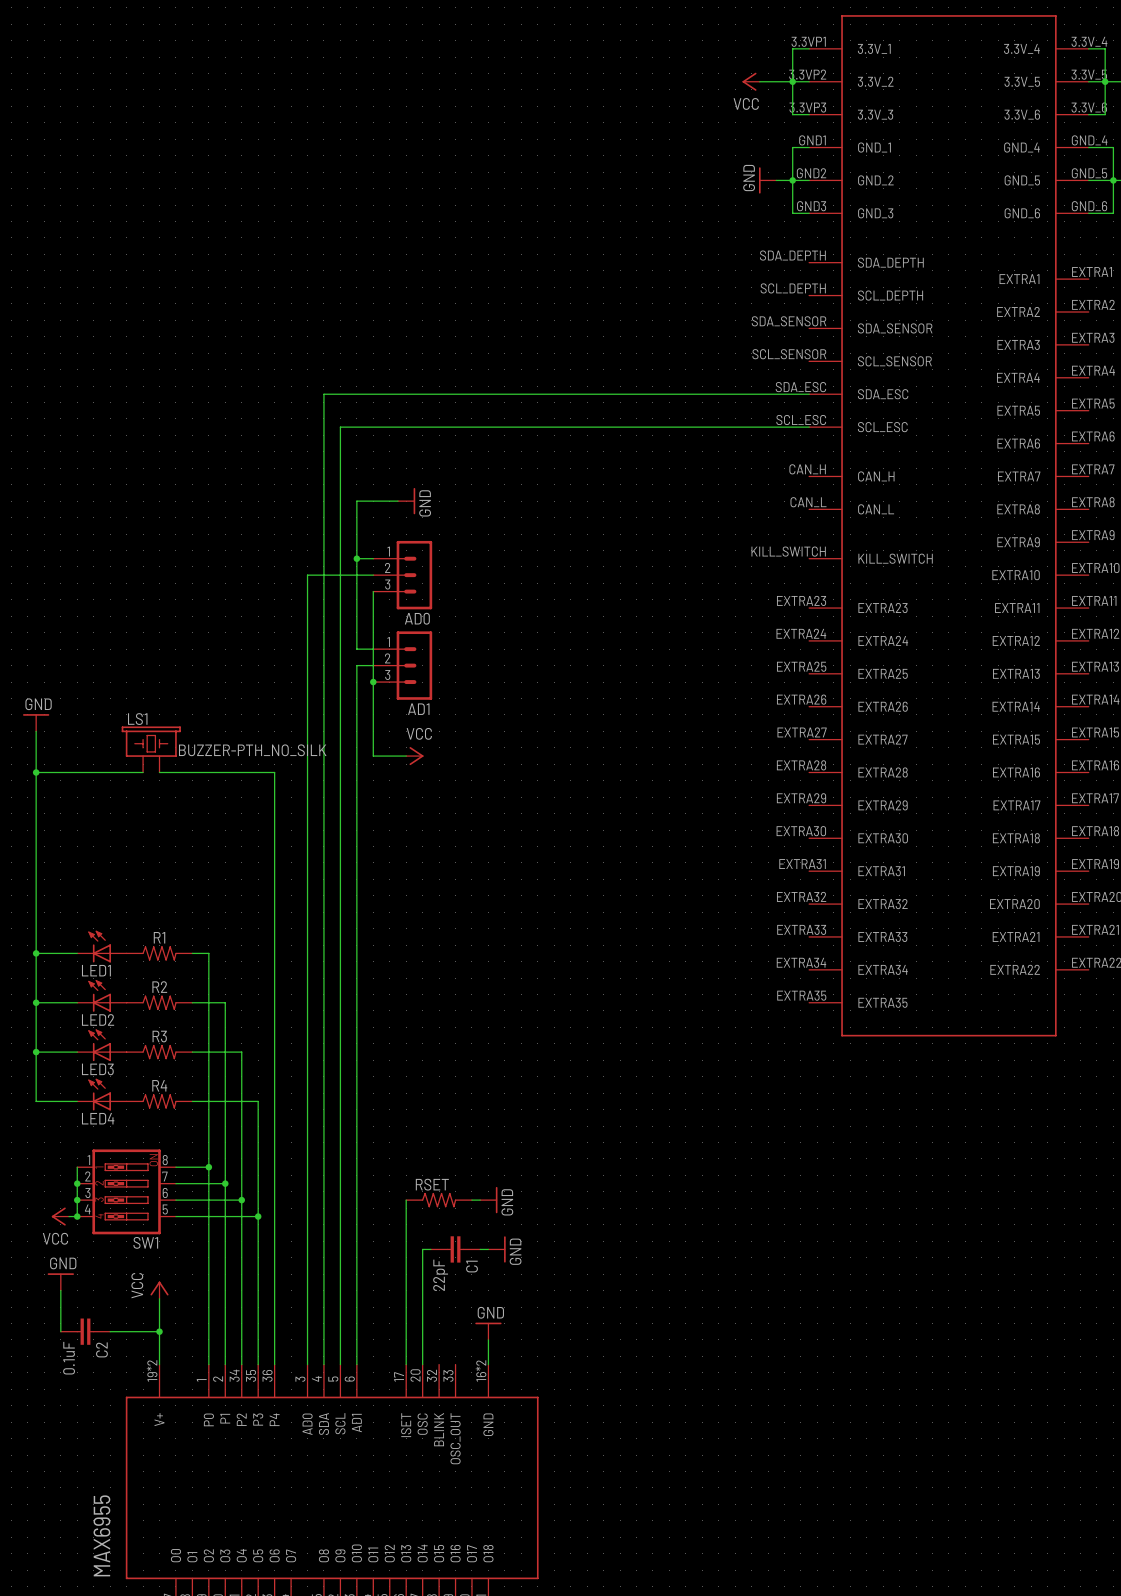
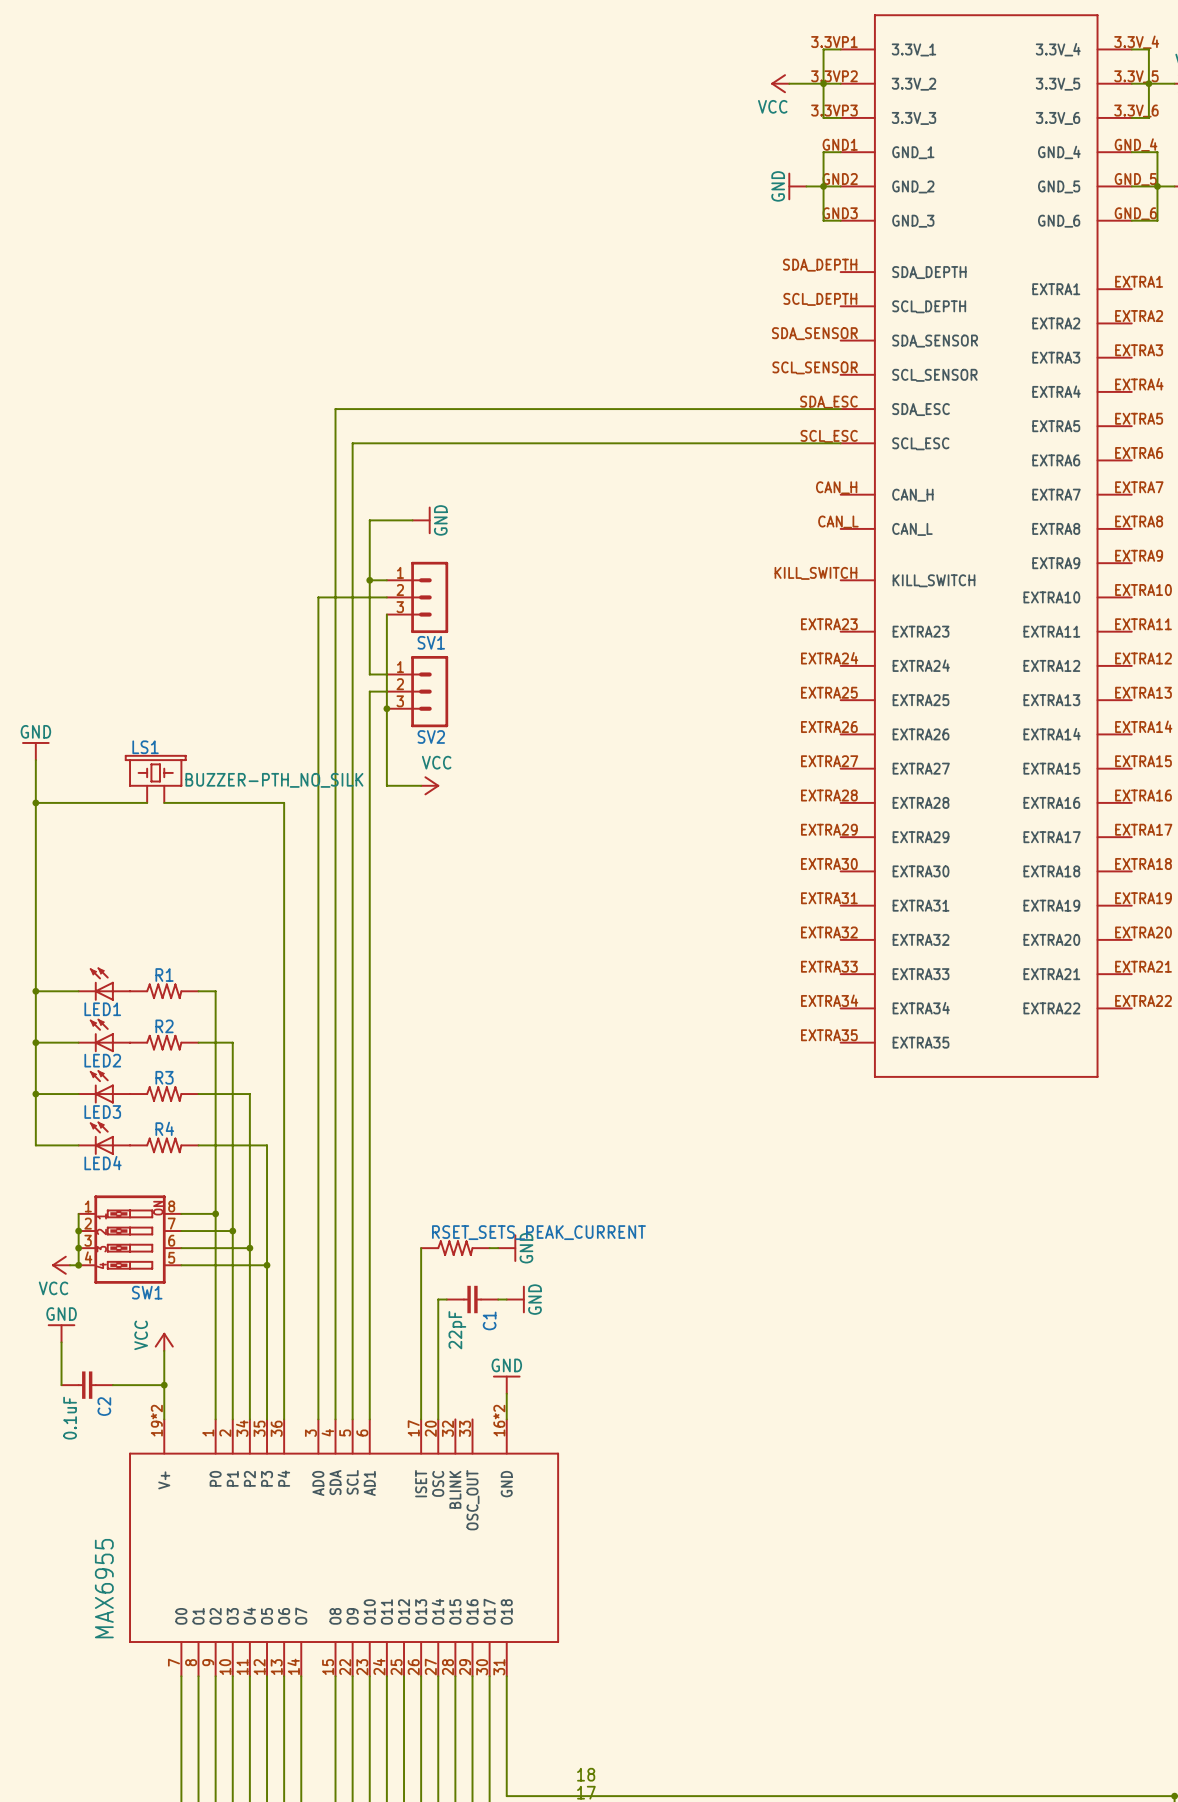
AD0 name: AD0 (417, 618) -> SV1 (431, 642)
AD1 name: AD1 (418, 709) -> SV2 (431, 736)
RSET name: RSET (432, 1184) -> RSET_SETS_PEAK_CURRENT (538, 1232)

